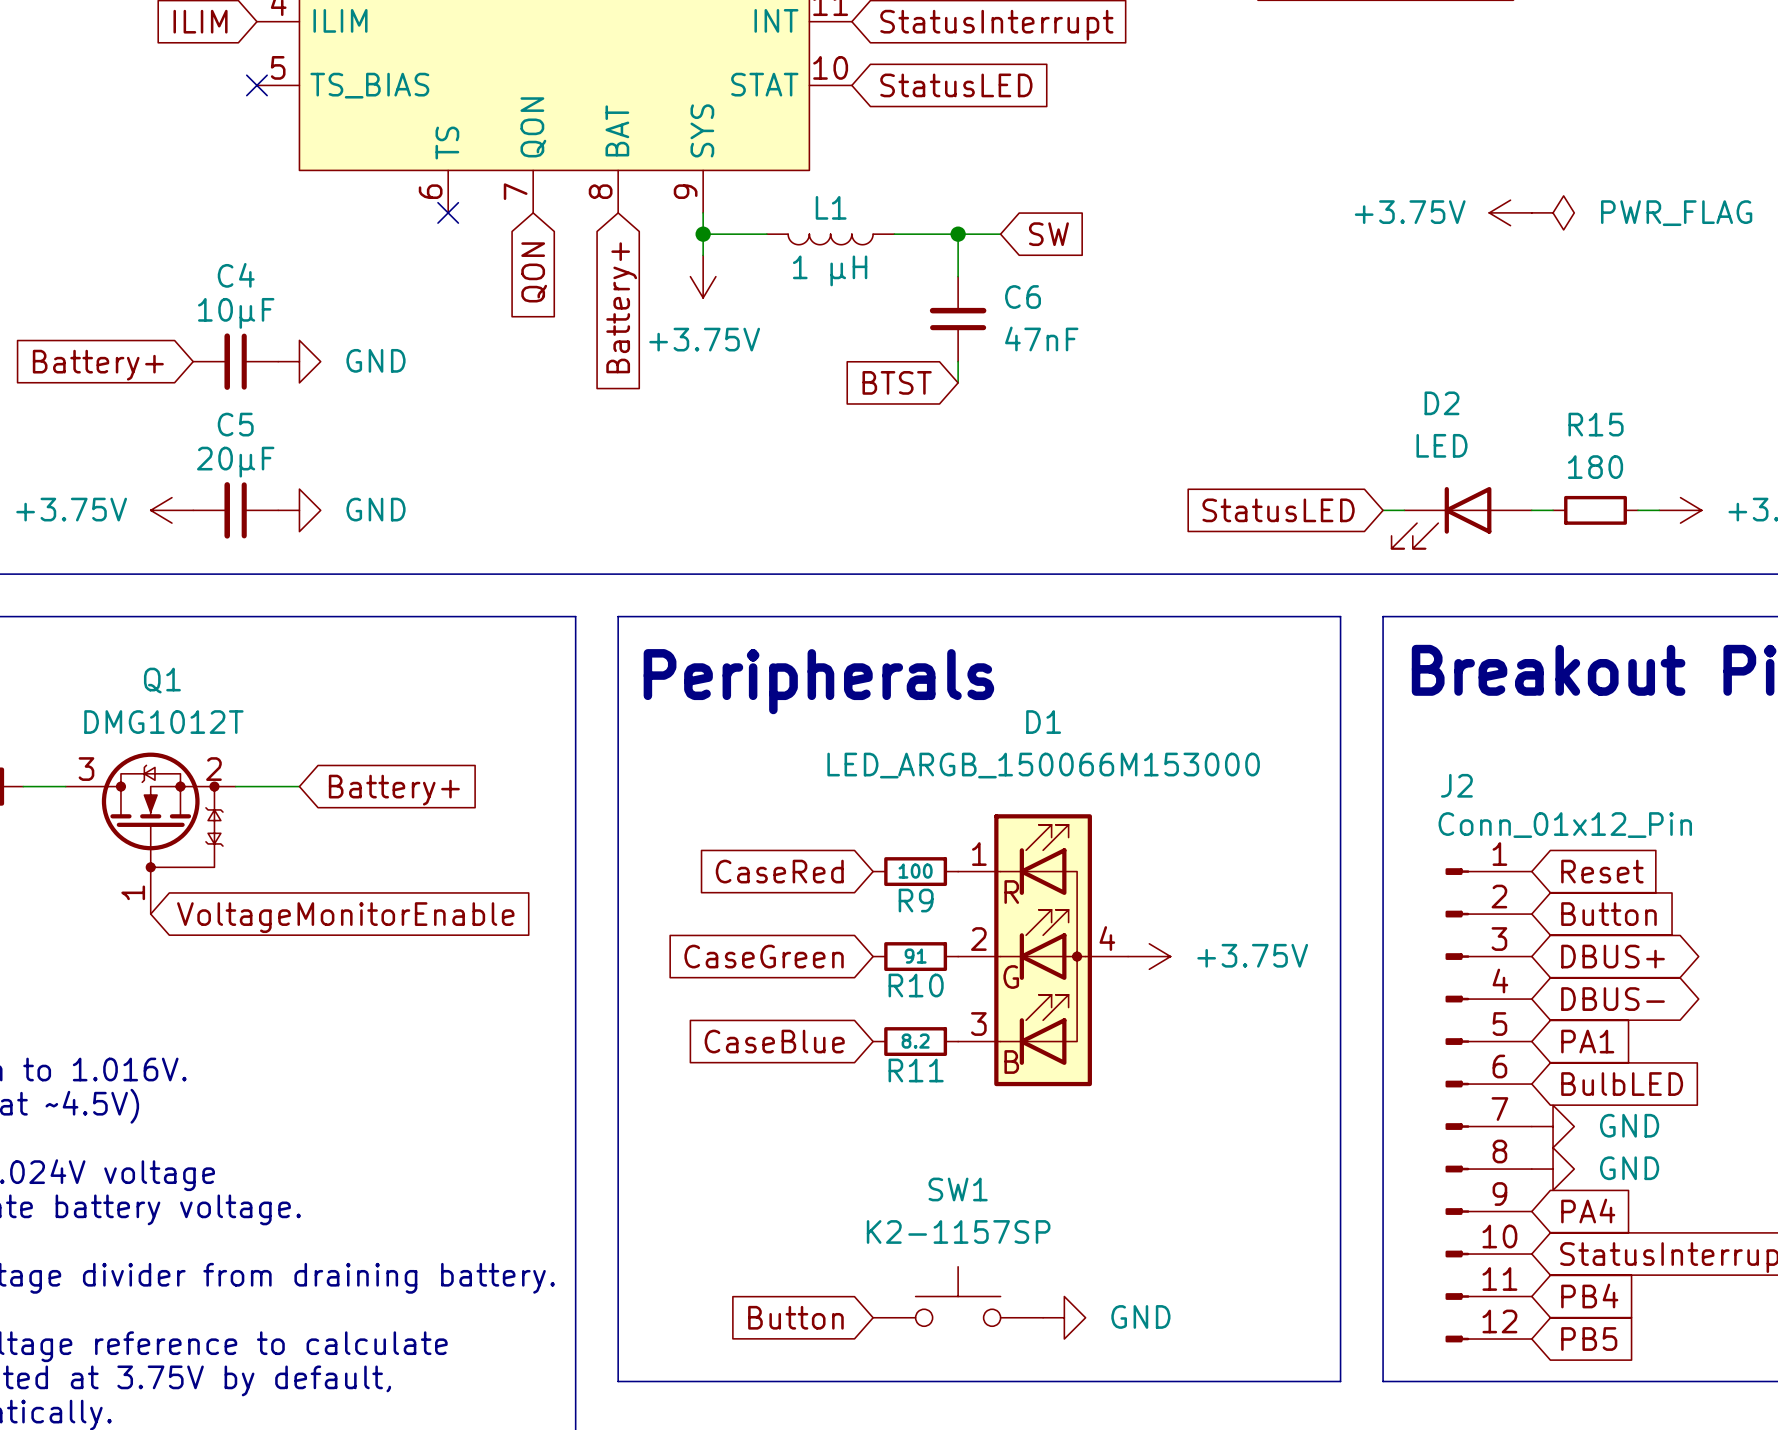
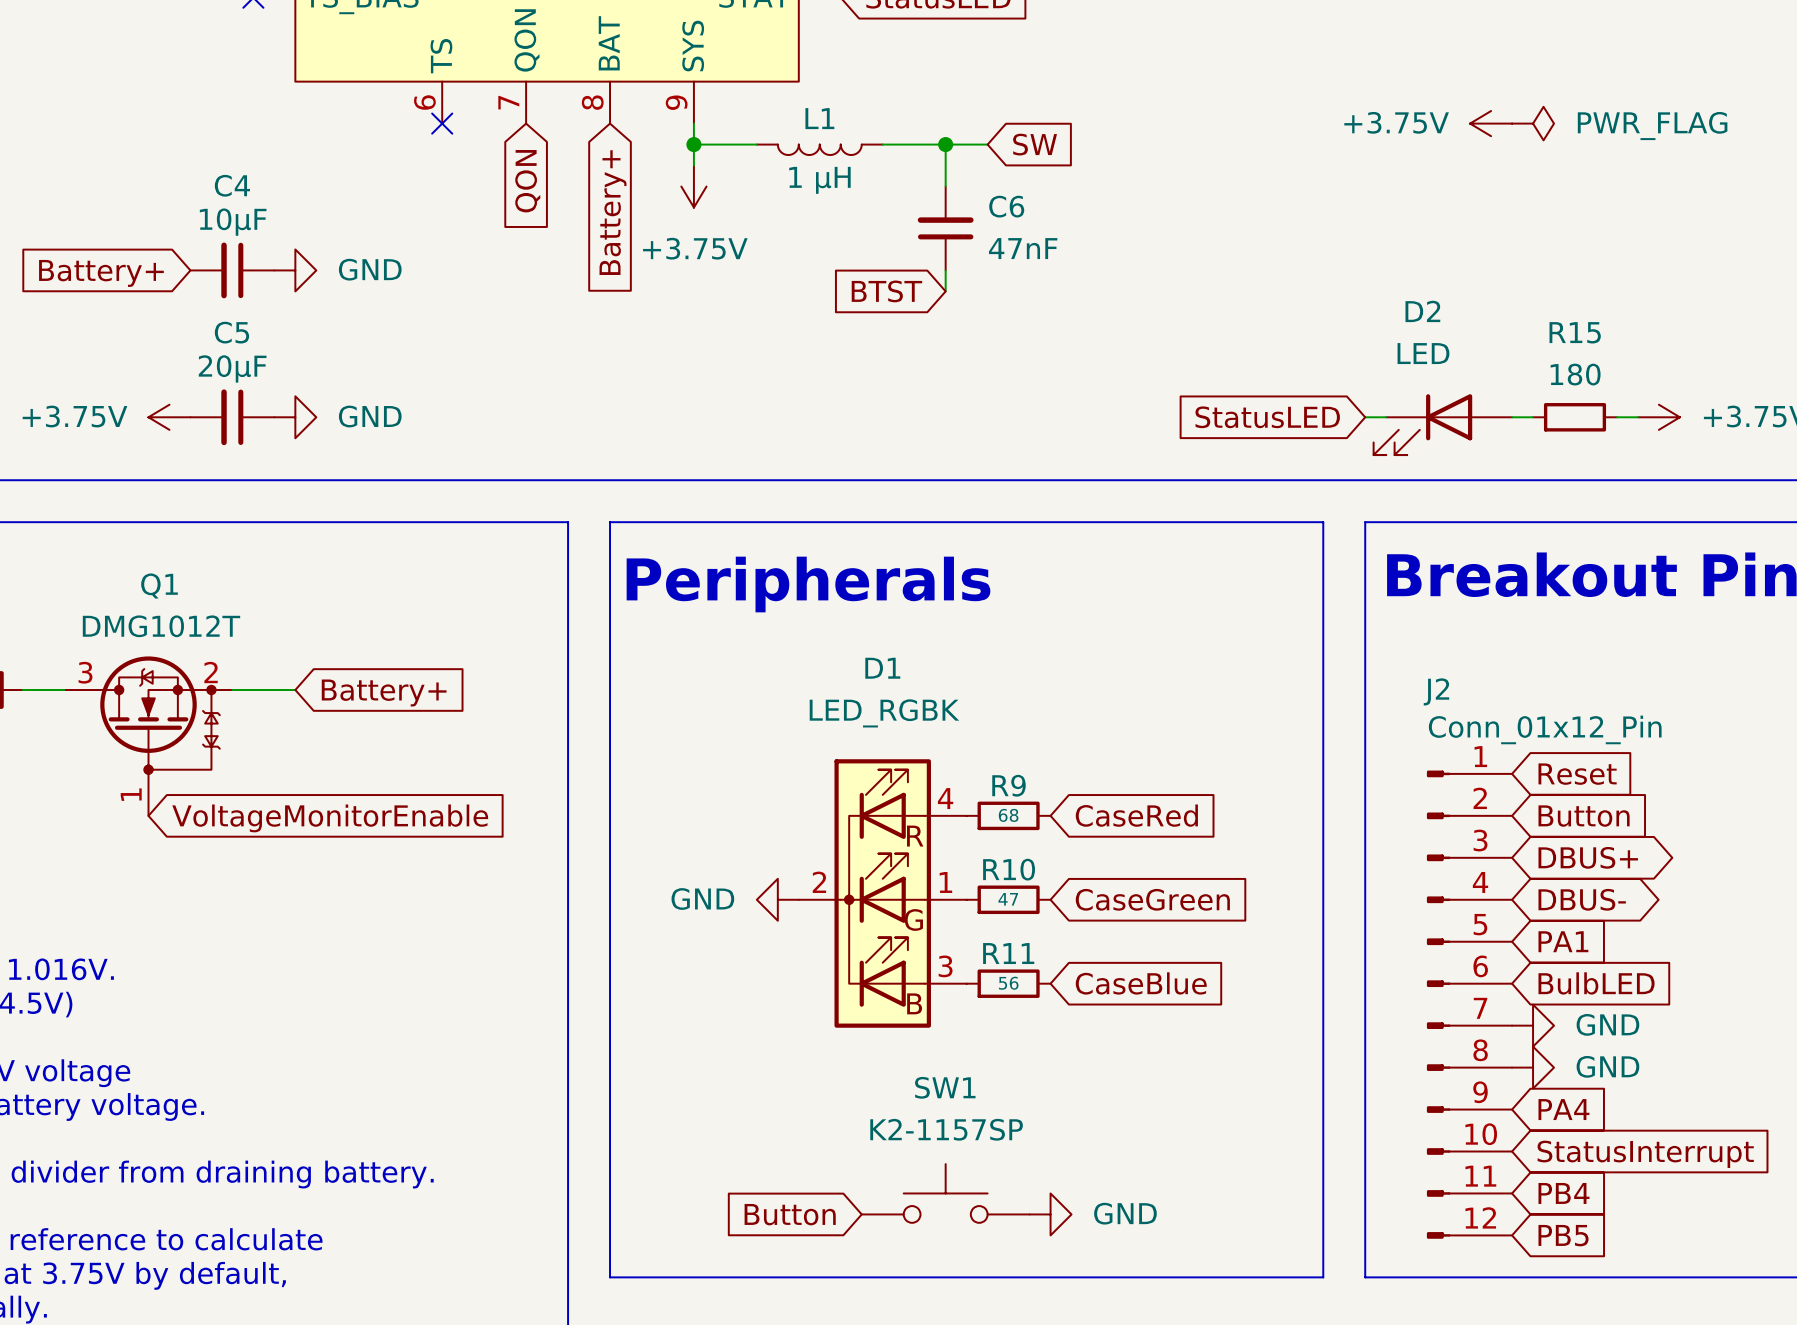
D1 value: LED_ARGB_150066M153000 (1043, 765) -> LED_RGBK (884, 713)
D1 symbol: [958, 814, 1129, 1087] -> [798, 759, 967, 1028]
global label rotation: 0° (779, 871) -> 180° (1136, 815)
global label position: CaseRed (779, 871) -> CaseRed (1136, 815)
R9 position: (915, 871) -> (1008, 815)
R9 value: 100 (915, 871) -> 68 (1008, 815)
R9 name position: R9 (916, 900) -> R9 (1009, 785)
global label rotation: 0° (764, 956) -> 180° (1152, 899)
global label position: CaseGreen (764, 956) -> CaseGreen (1152, 899)
R10 position: (915, 956) -> (1008, 899)
R10 value: 91 (915, 956) -> 47 (1008, 899)
power symbol: +3.75V (1149, 956) -> none
R10 name position: R10 (916, 985) -> R10 (1009, 869)
power symbol: none -> GND (777, 899)
global label rotation: 0° (774, 1041) -> 180° (1141, 983)
global label position: CaseBlue (774, 1041) -> CaseBlue (1141, 983)
R11 position: (915, 1041) -> (1008, 983)
R11 value: 8.2 (915, 1041) -> 56 (1008, 983)
R11 name position: R11 (916, 1070) -> R11 (1008, 953)

